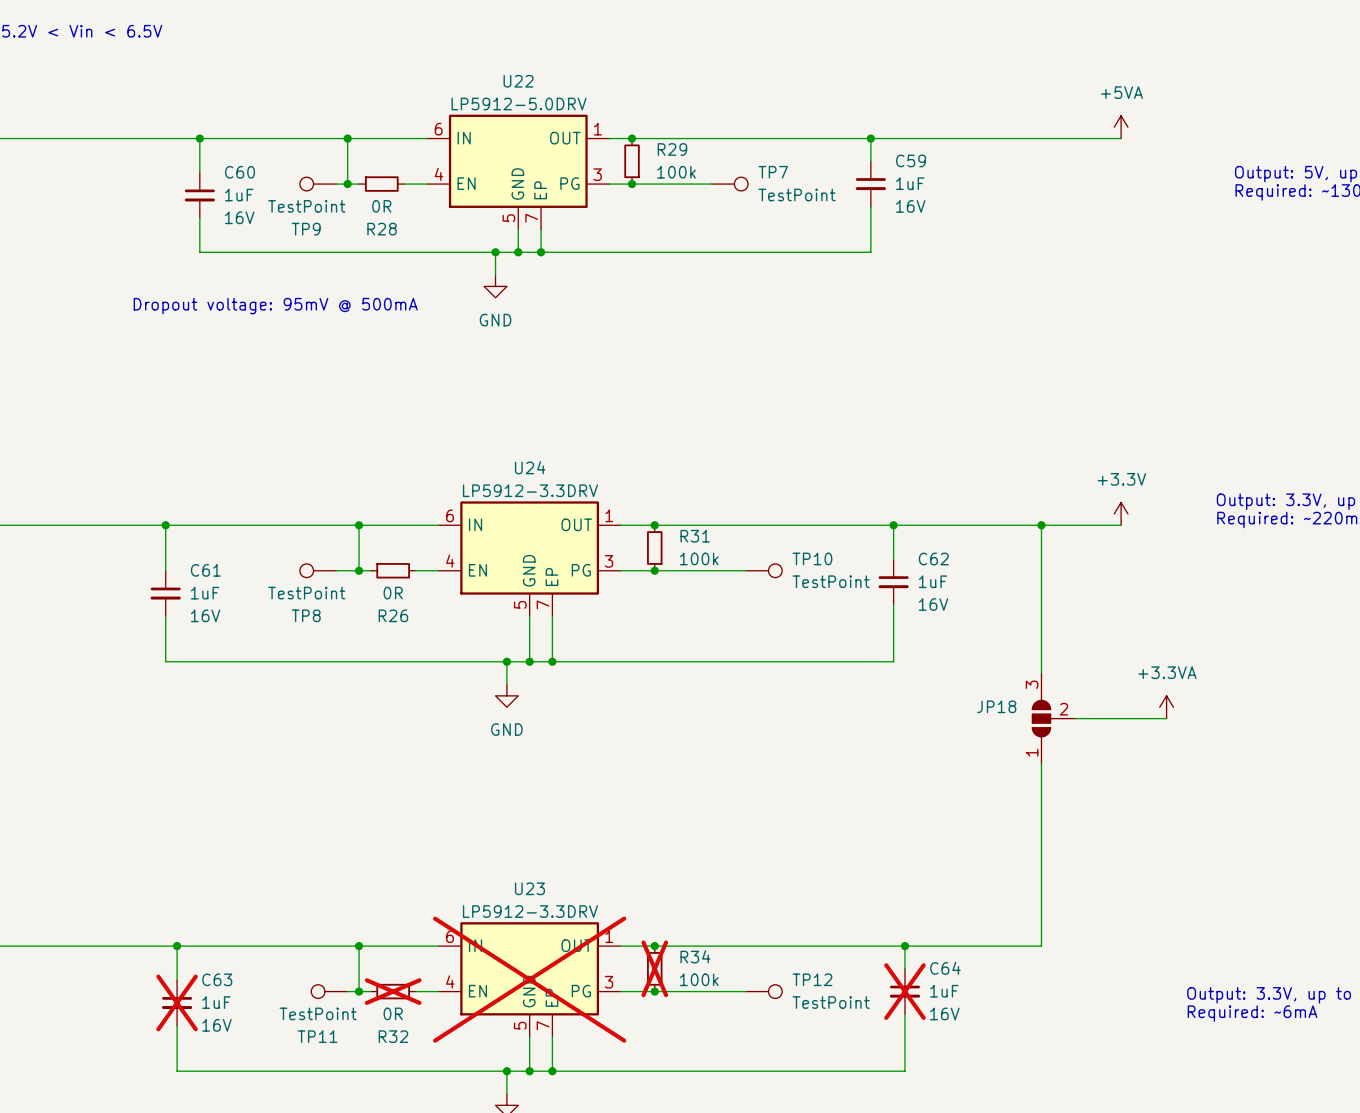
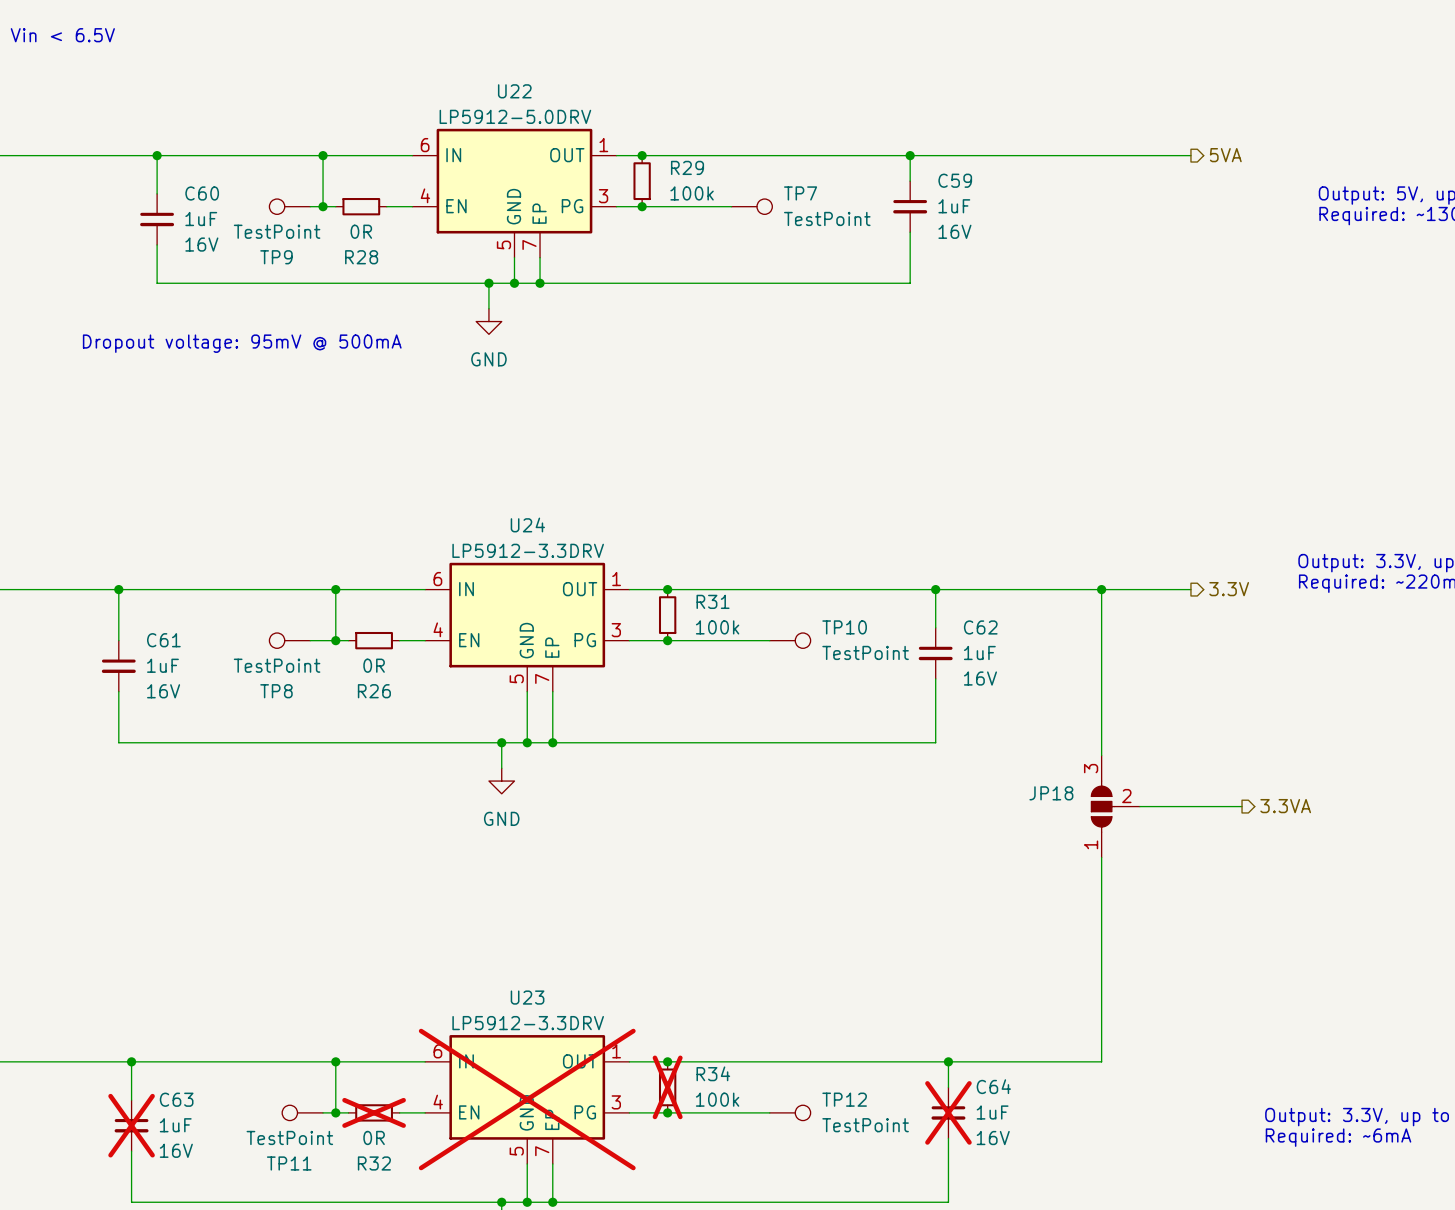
power symbol: +5VA (1121, 127) -> none
hierarchical label: none -> 5VA (1225, 155)
power symbol: +3.3V (1121, 513) -> none
hierarchical label: none -> 3.3V (1229, 589)
power symbol: +3.3VA (1166, 707) -> none
hierarchical label: none -> 3.3VA (1285, 806)

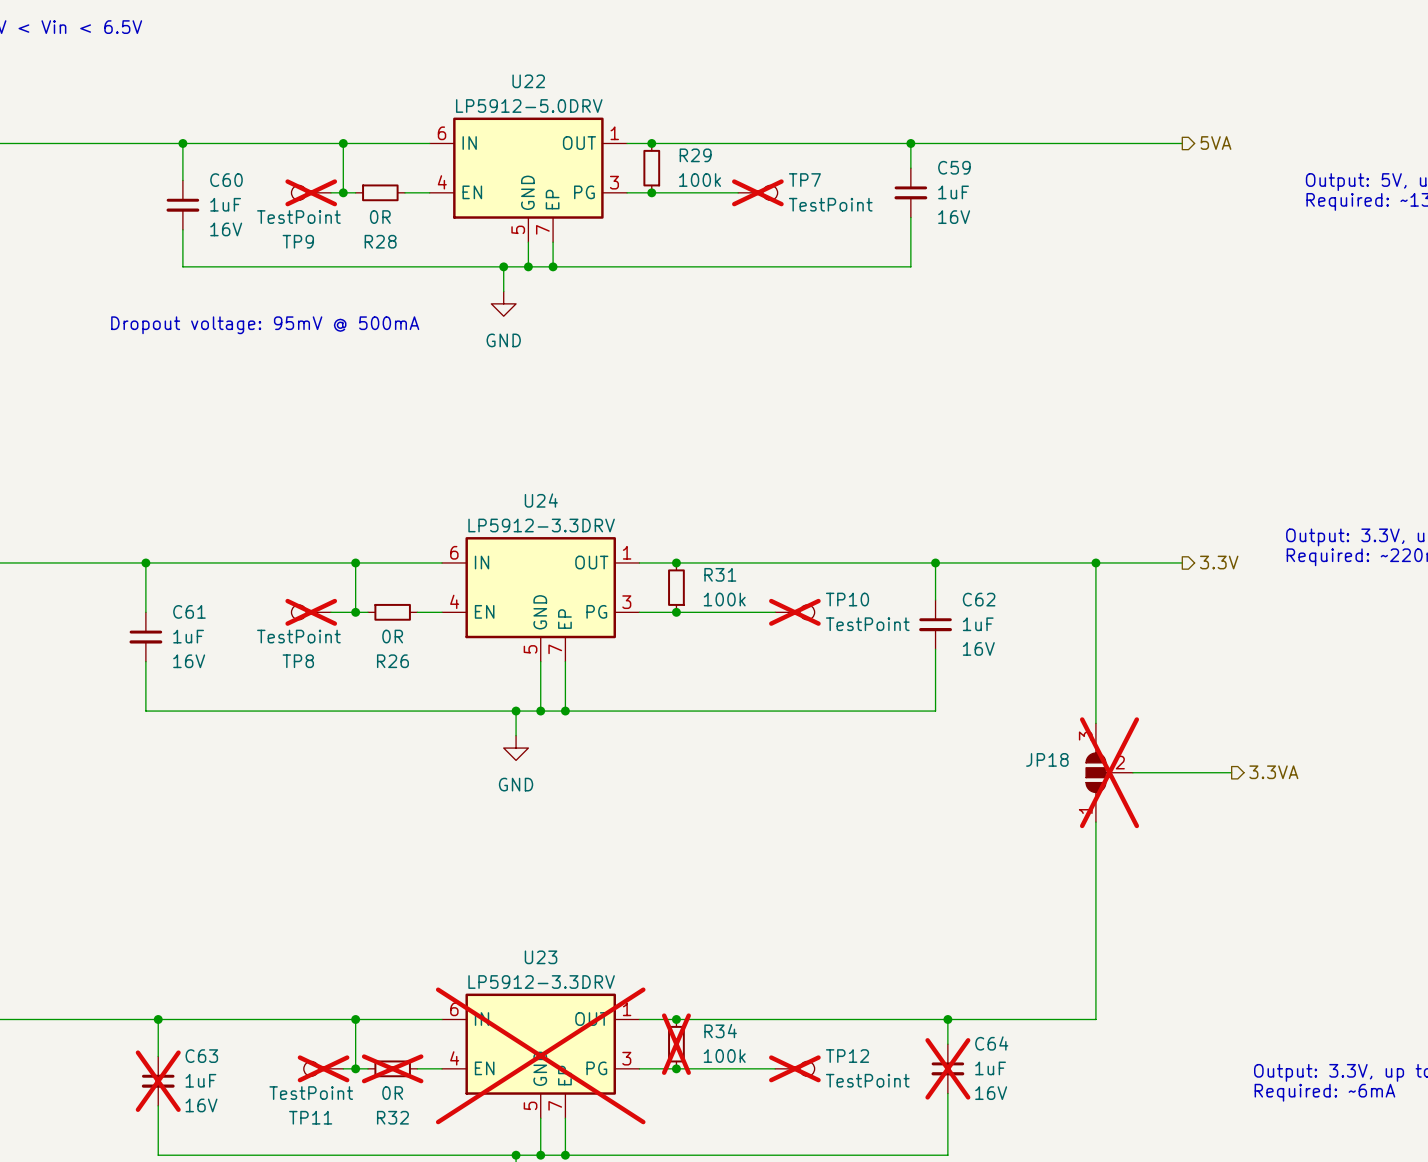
TP9 do-not-place cross: none -> (311, 192)
TP7 do-not-place cross: none -> (757, 192)
TP8 do-not-place cross: none -> (311, 612)
TP10 do-not-place cross: none -> (794, 612)
JP18 do-not-place cross: none -> (1109, 772)
TP11 do-not-place cross: none -> (323, 1068)
TP12 do-not-place cross: none -> (794, 1068)

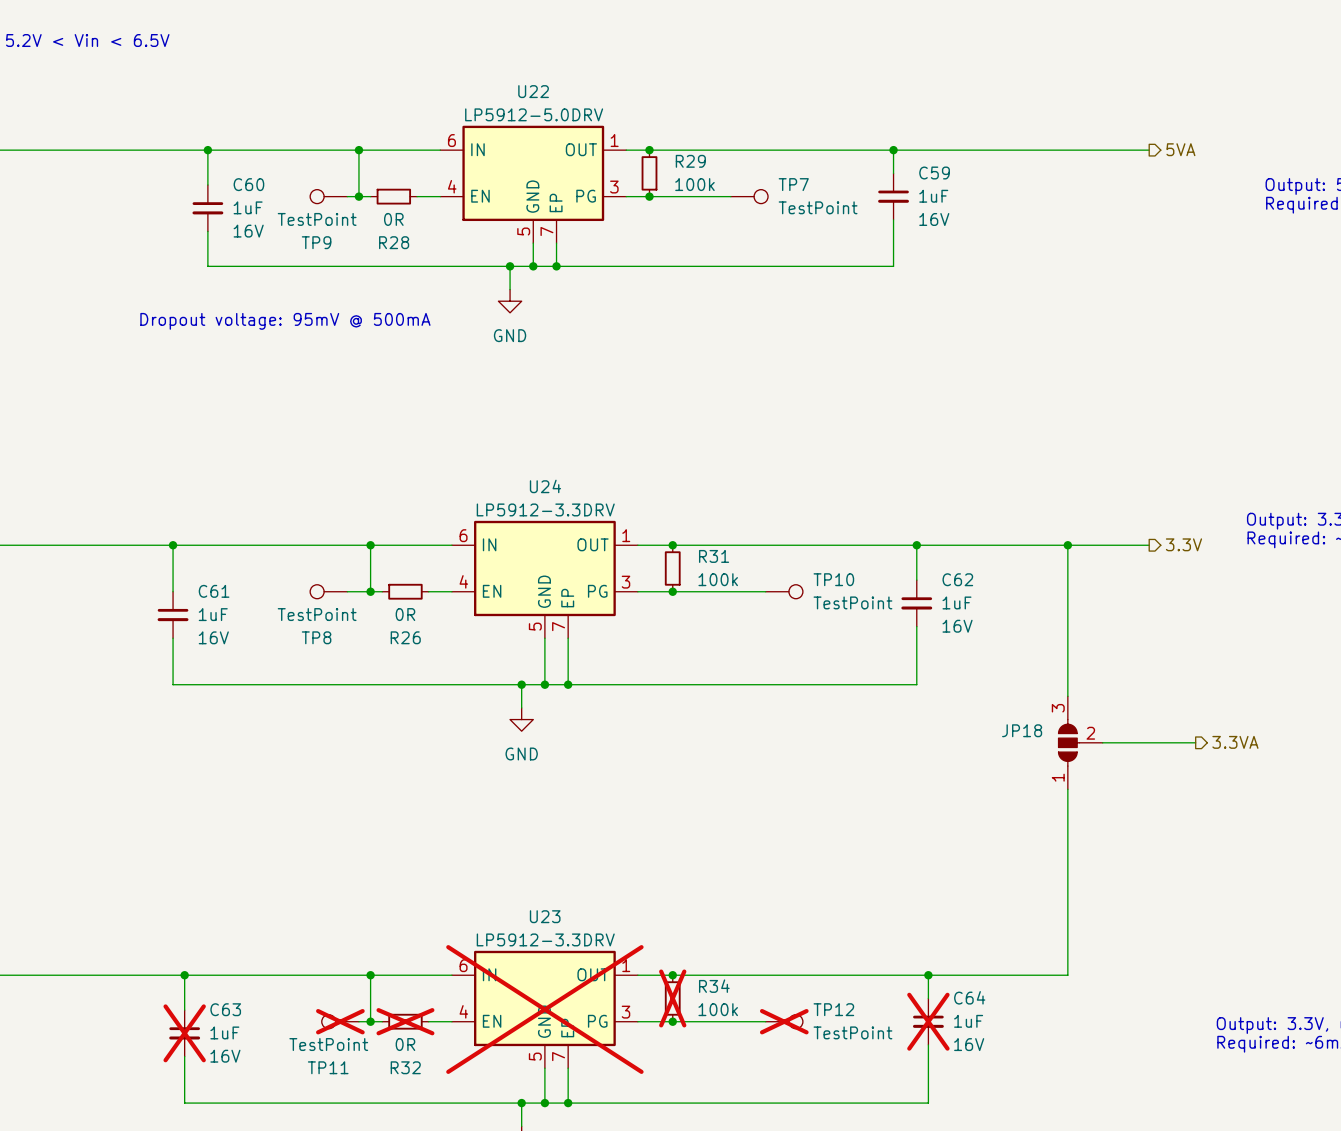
TP9 do-not-place cross: (311, 192) -> none
TP7 do-not-place cross: (757, 192) -> none
TP8 do-not-place cross: (311, 612) -> none
TP10 do-not-place cross: (794, 612) -> none
JP18 do-not-place cross: (1109, 772) -> none

